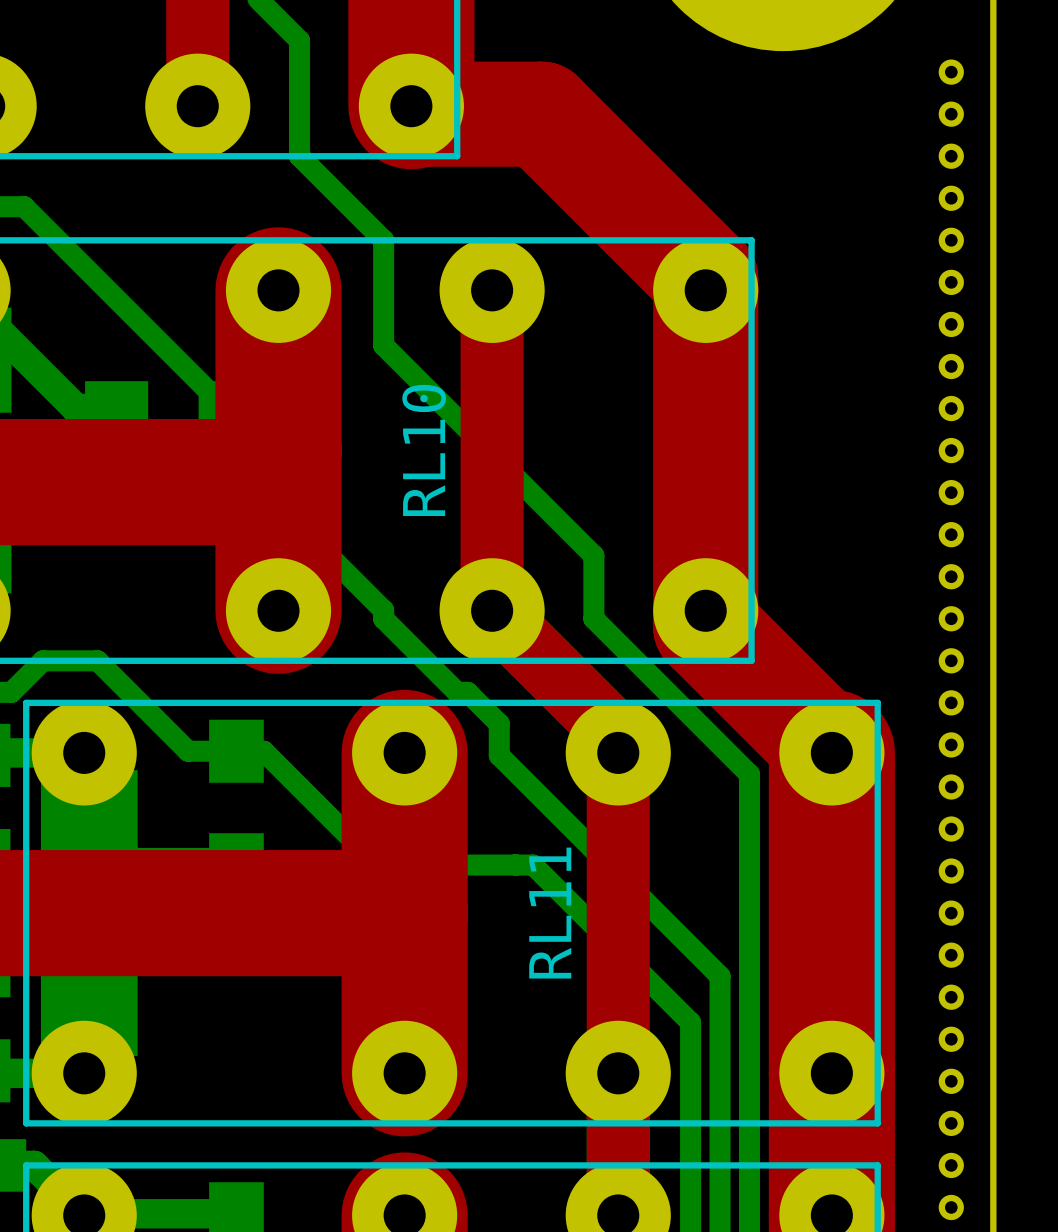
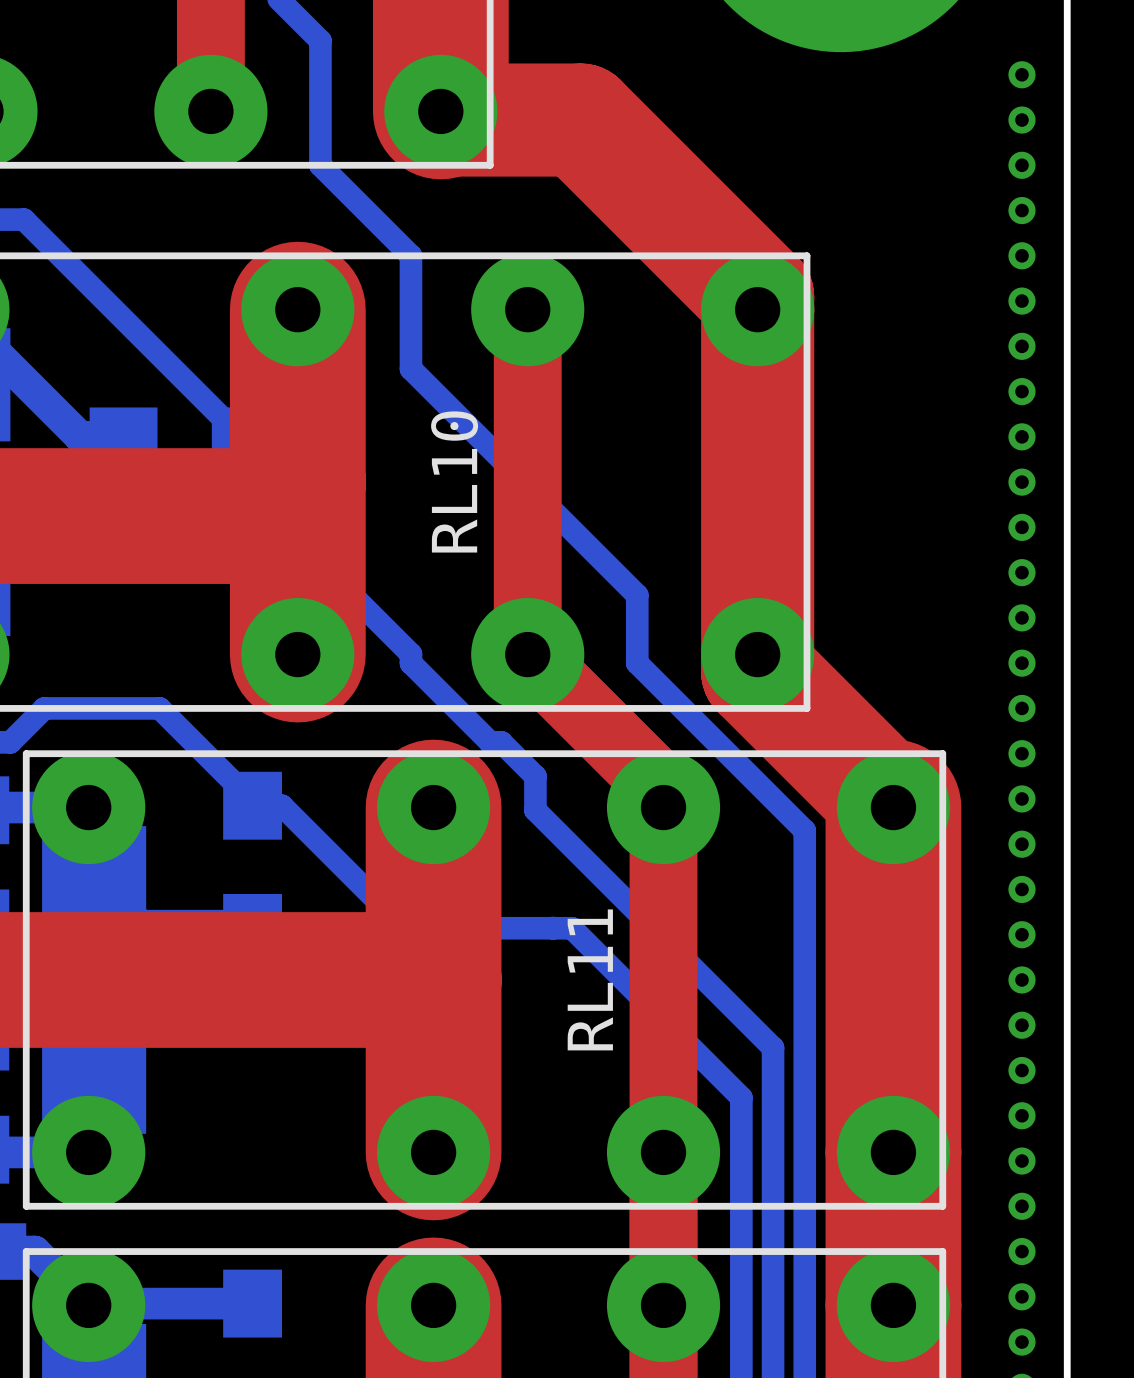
bottom track: (97, 660) (188, 751) (236, 751) -> (103, 708) (159, 708) (252, 801) (252, 805)

